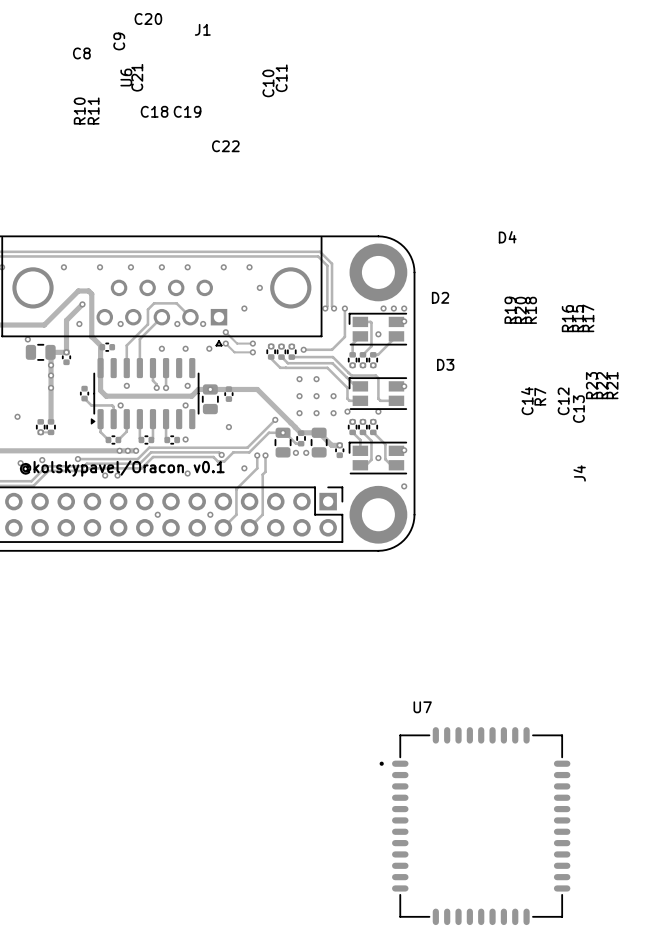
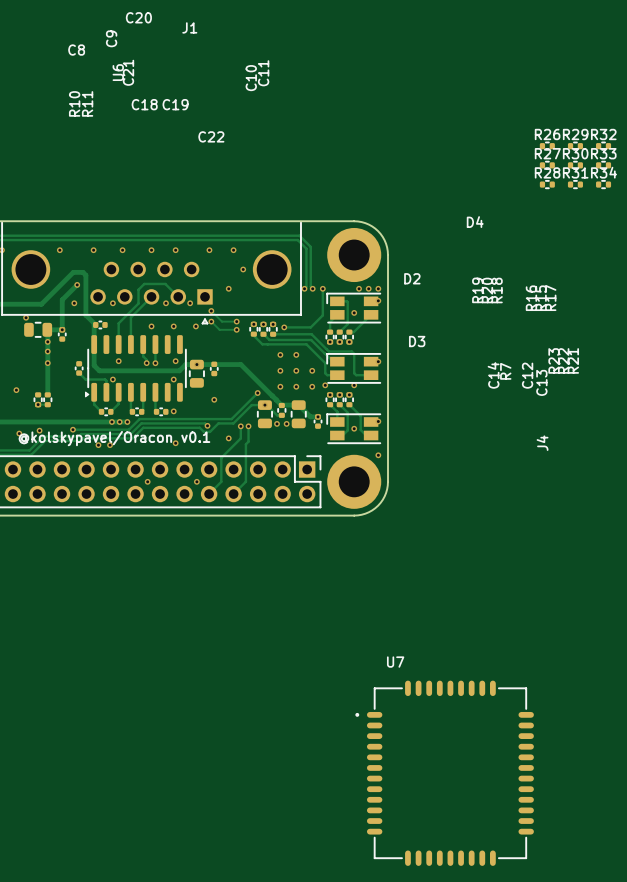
R26: none -> (547, 146)
R29: none -> (575, 146)
R32: none -> (603, 146)
R27: none -> (547, 165)
R30: none -> (575, 165)
R33: none -> (603, 165)
R28: none -> (547, 184)
R31: none -> (575, 184)
R34: none -> (603, 184)

